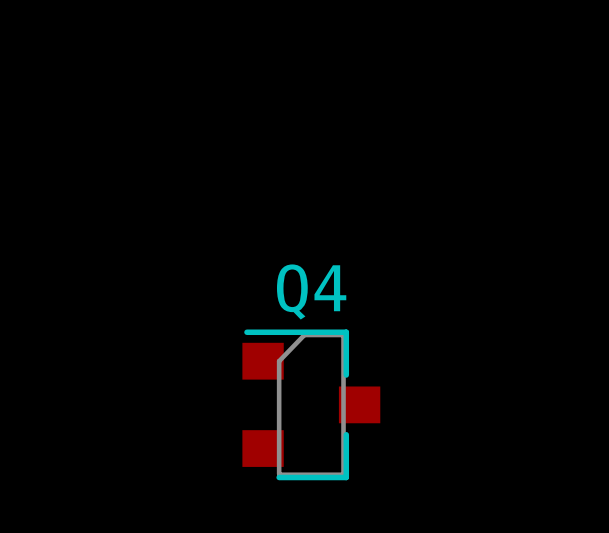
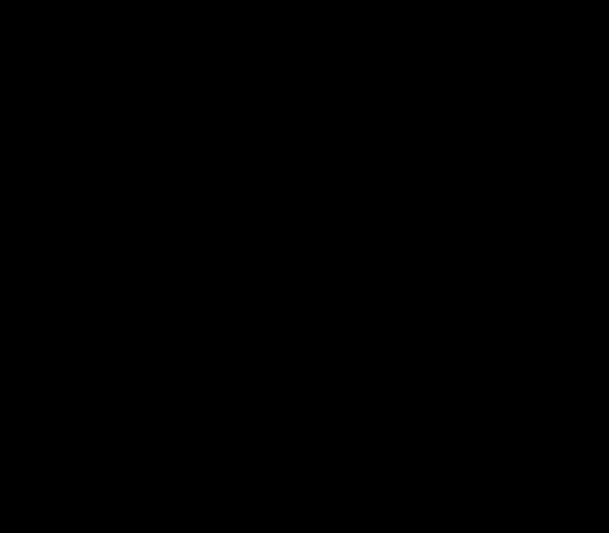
Q4: (311, 404) -> none

